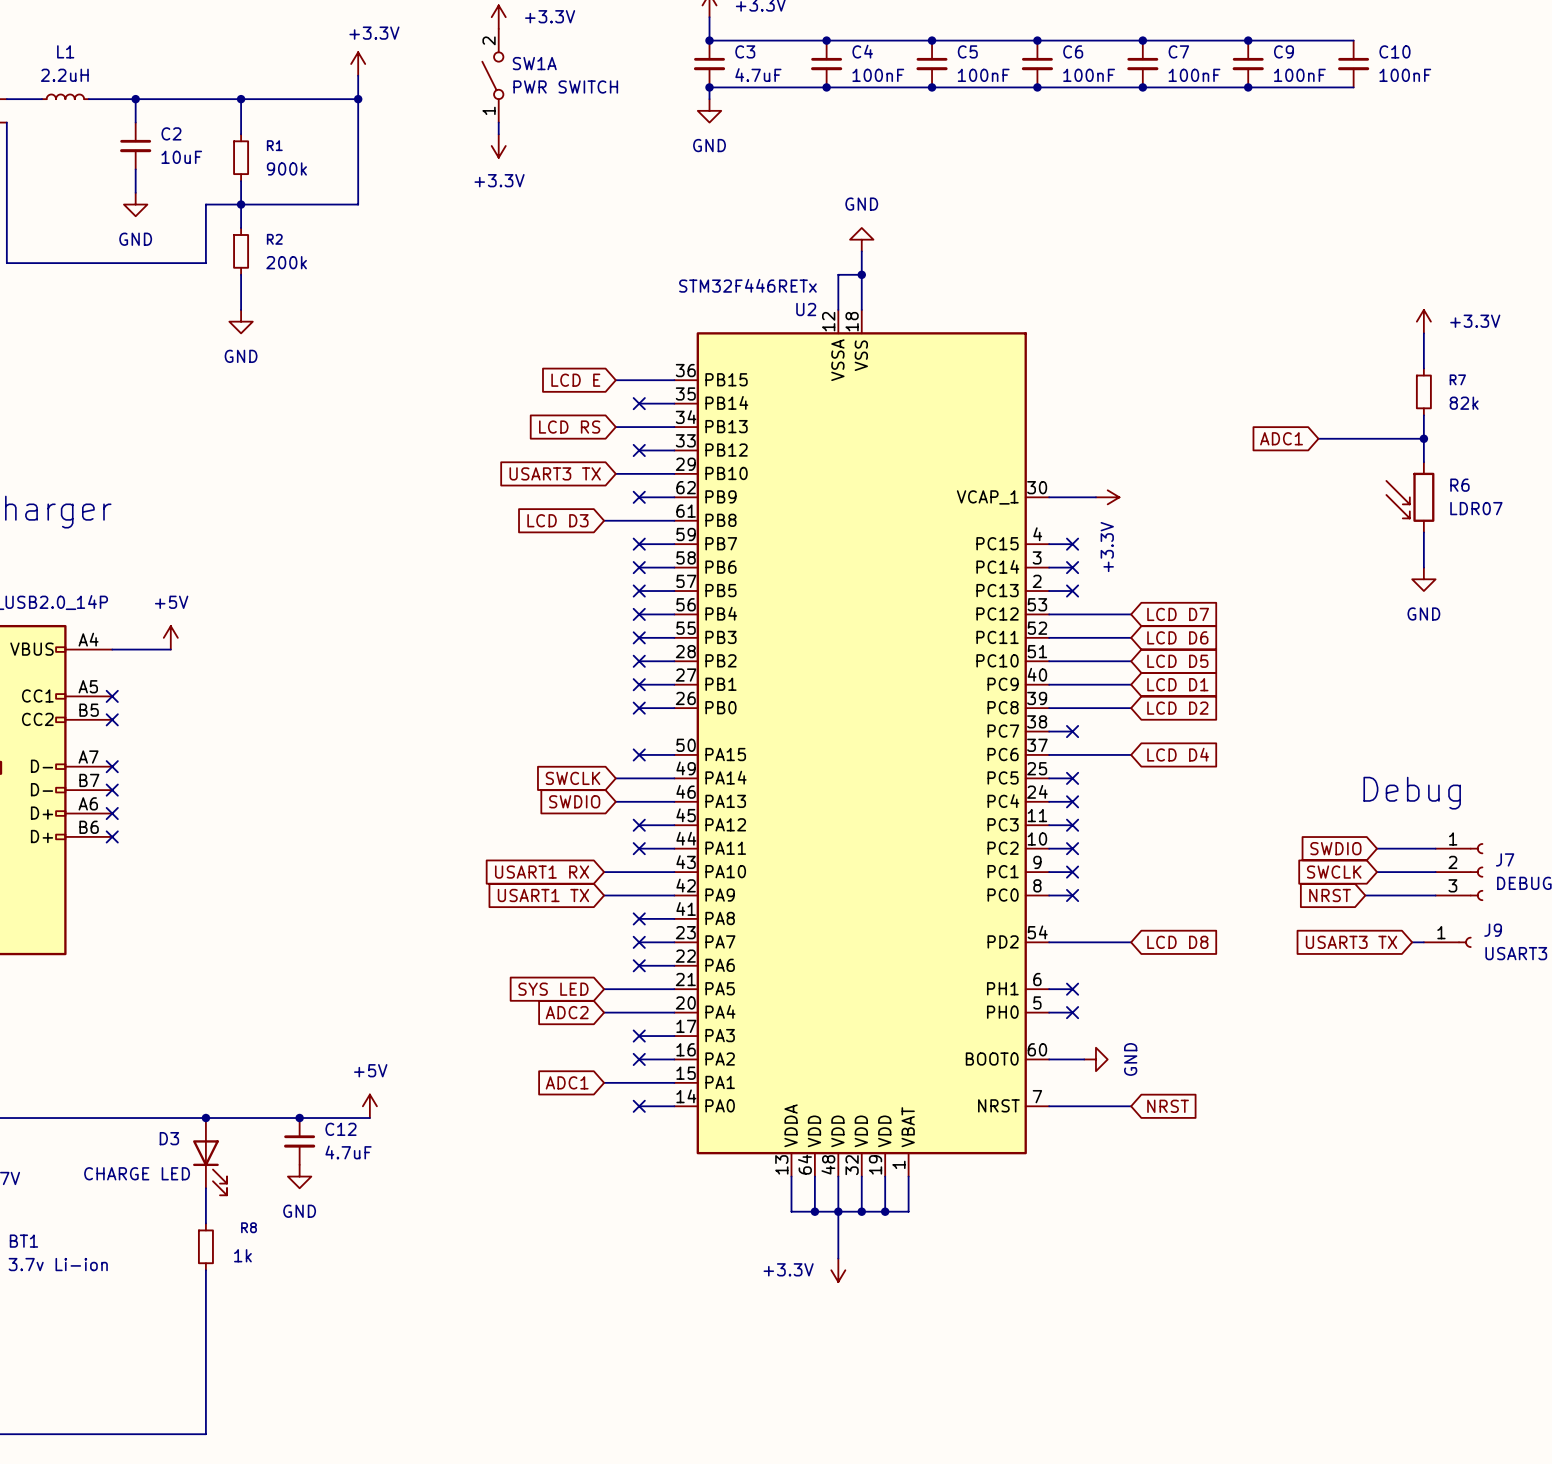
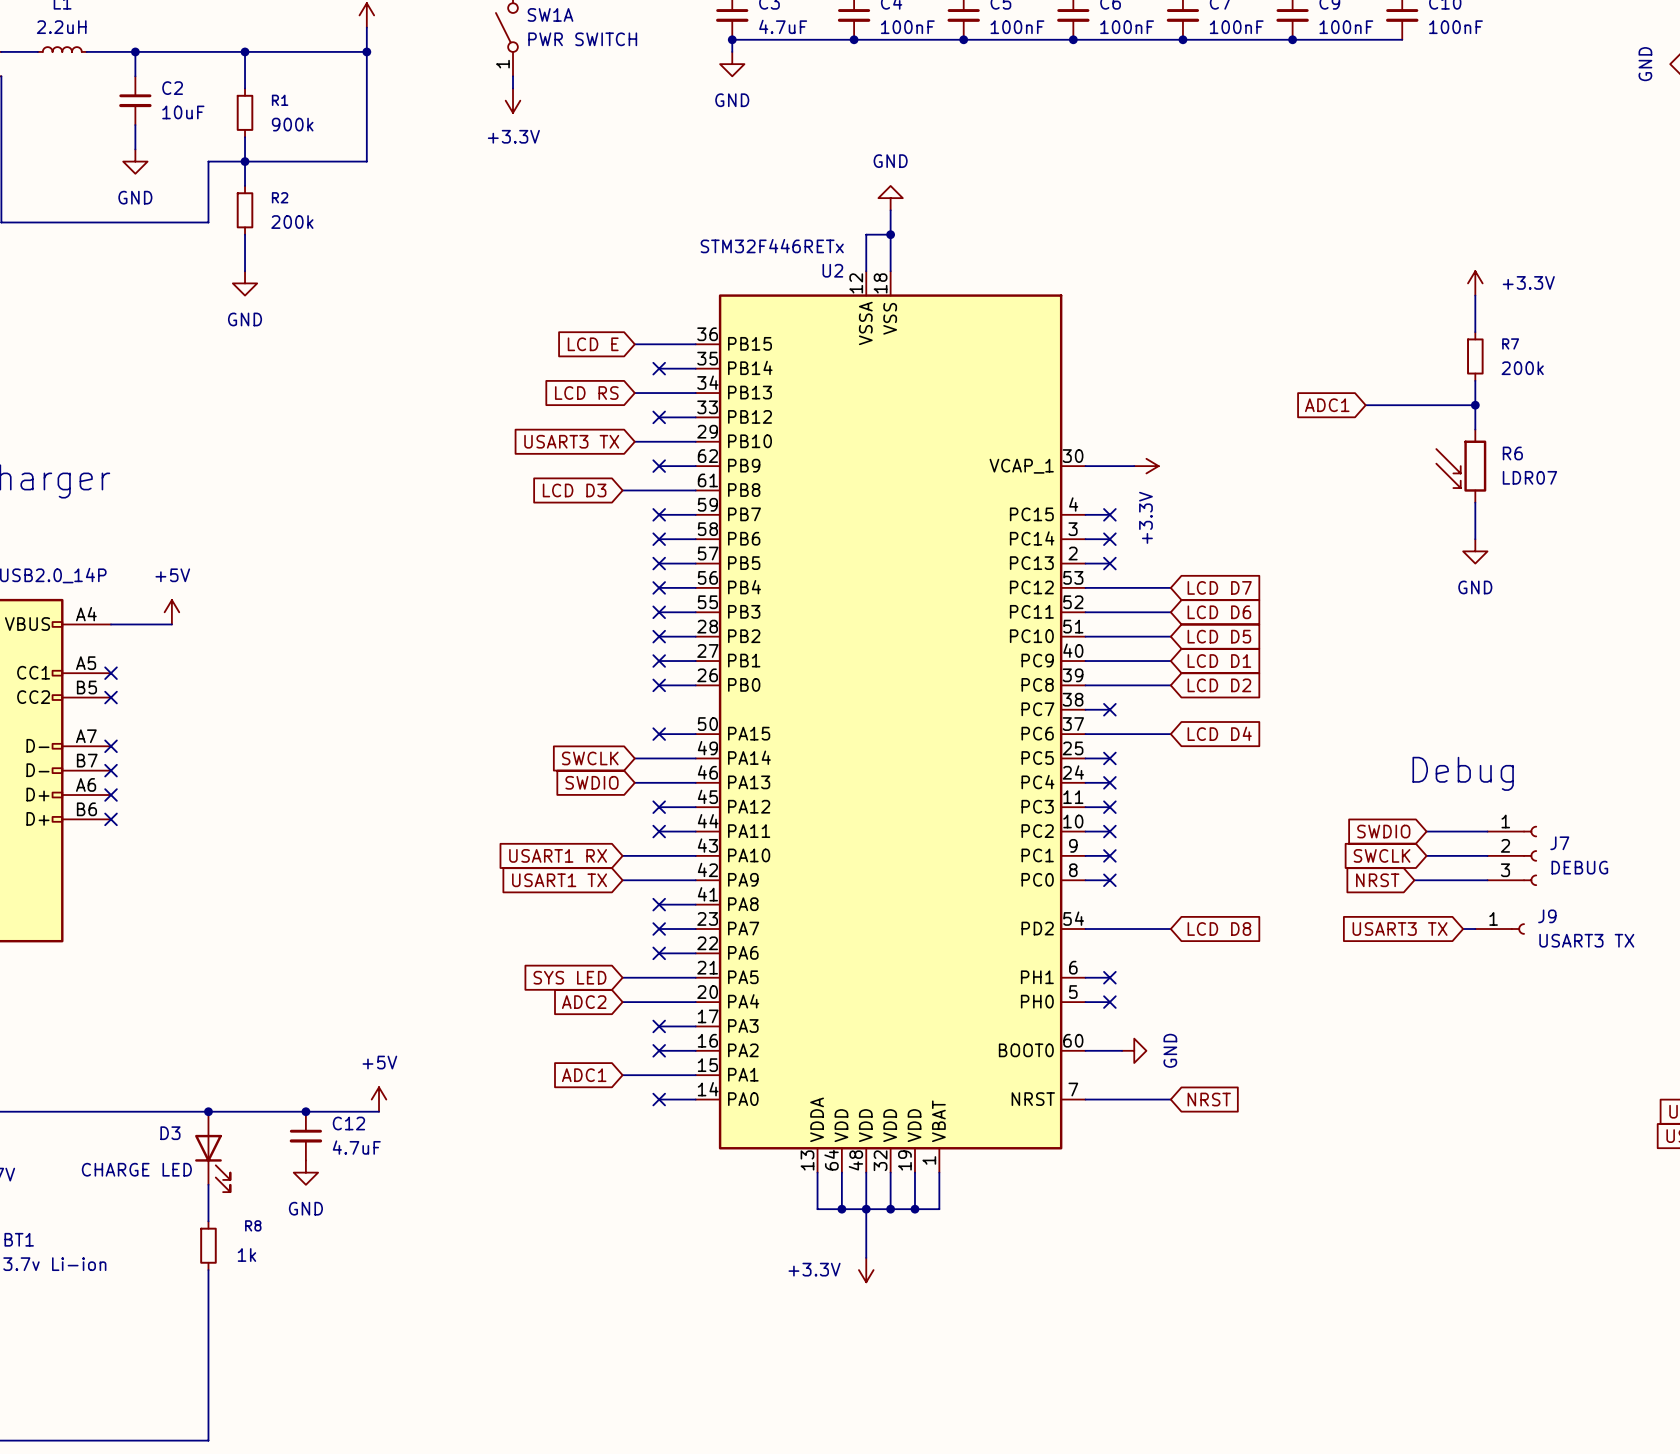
R7 value: 82k (1464, 403) -> 200k (1522, 368)

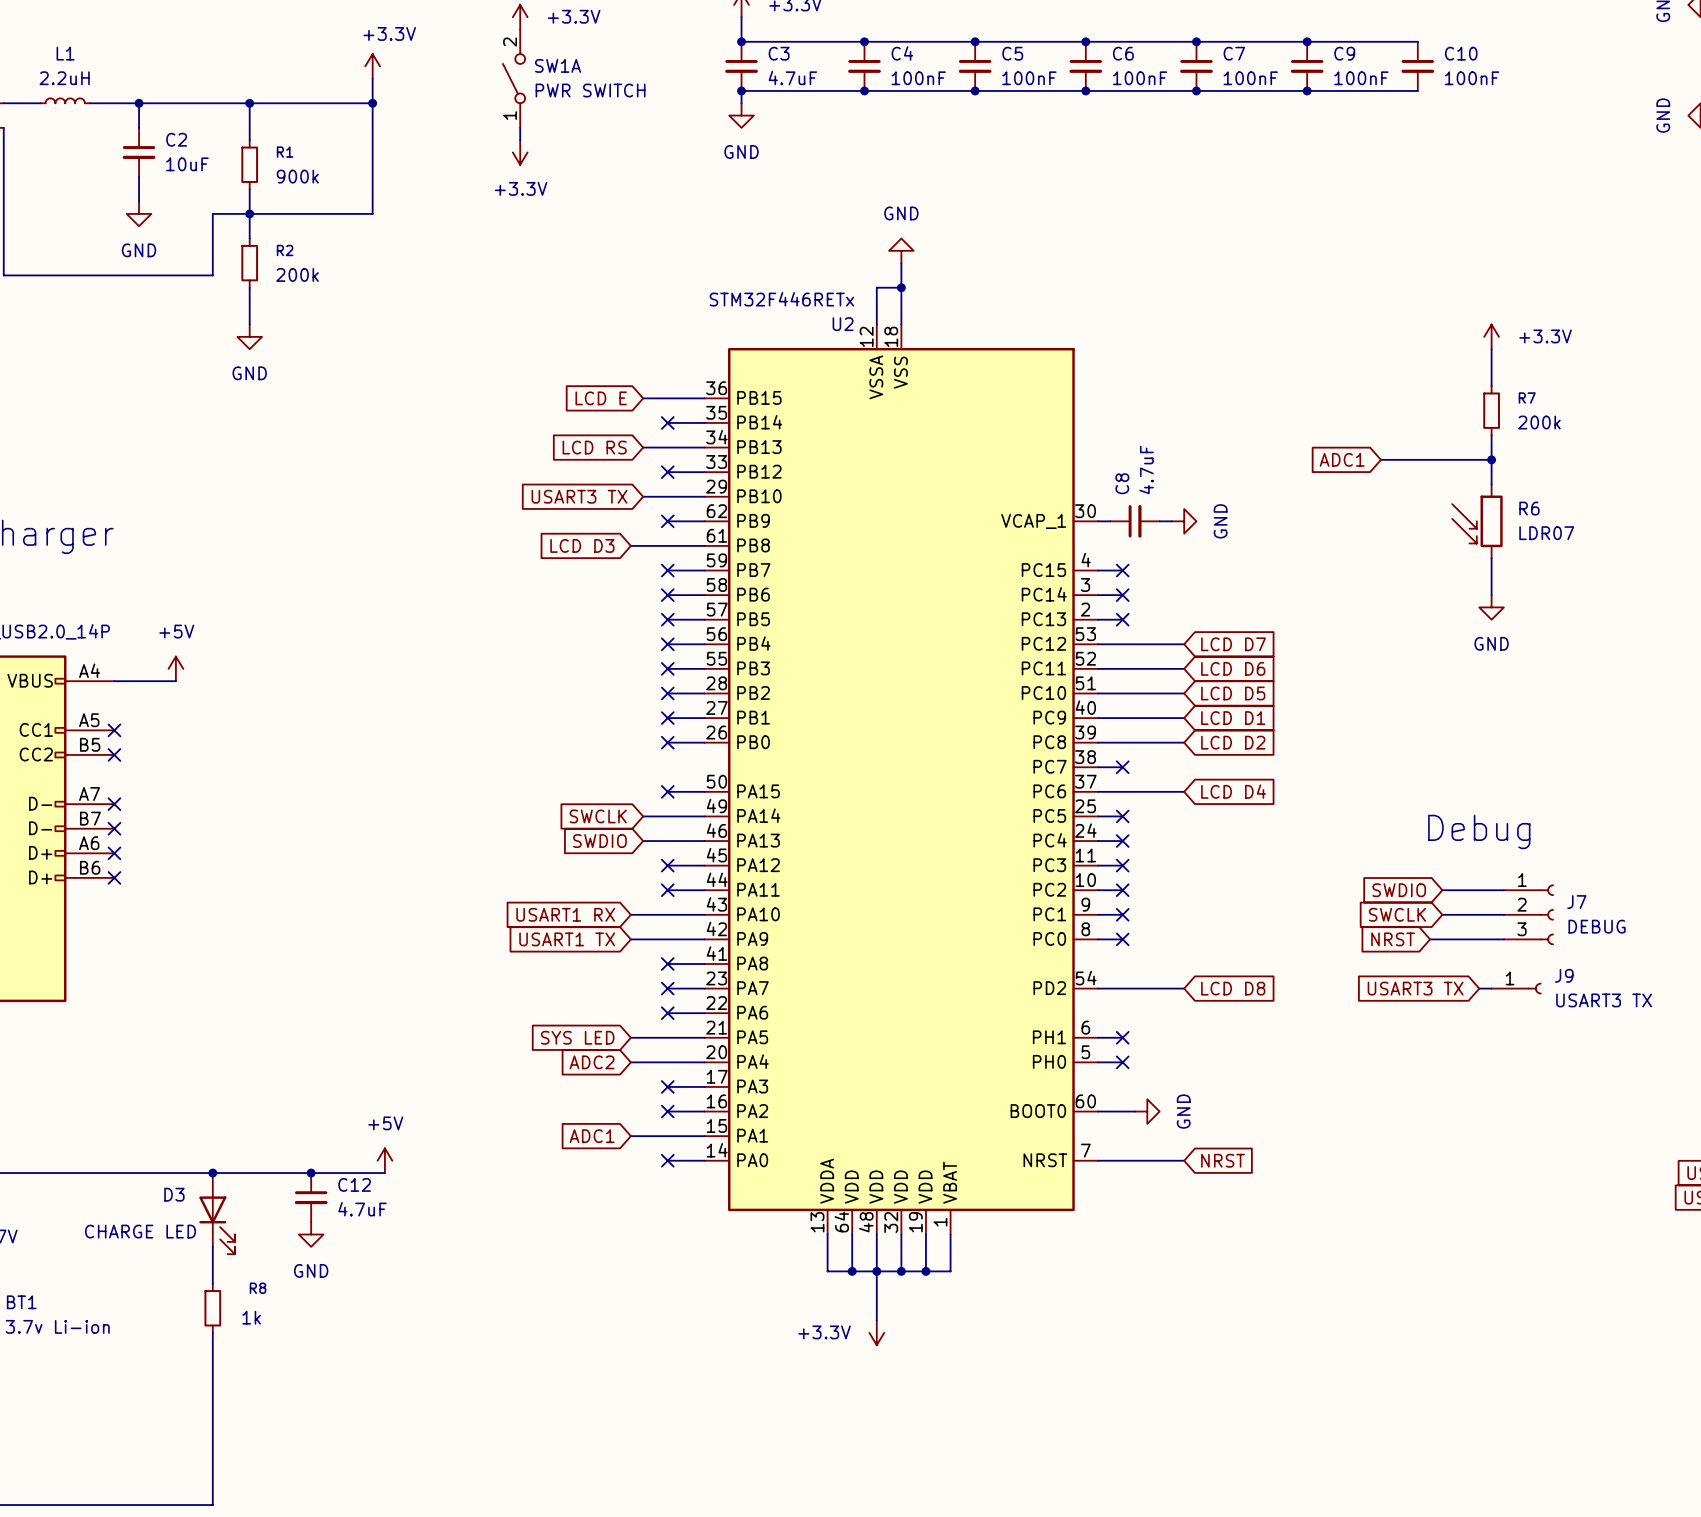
C8: none -> 4.7uF (1135, 521)
power symbol: +3.3V (1146, 466) -> none
power symbol: none -> GND (1184, 521)

